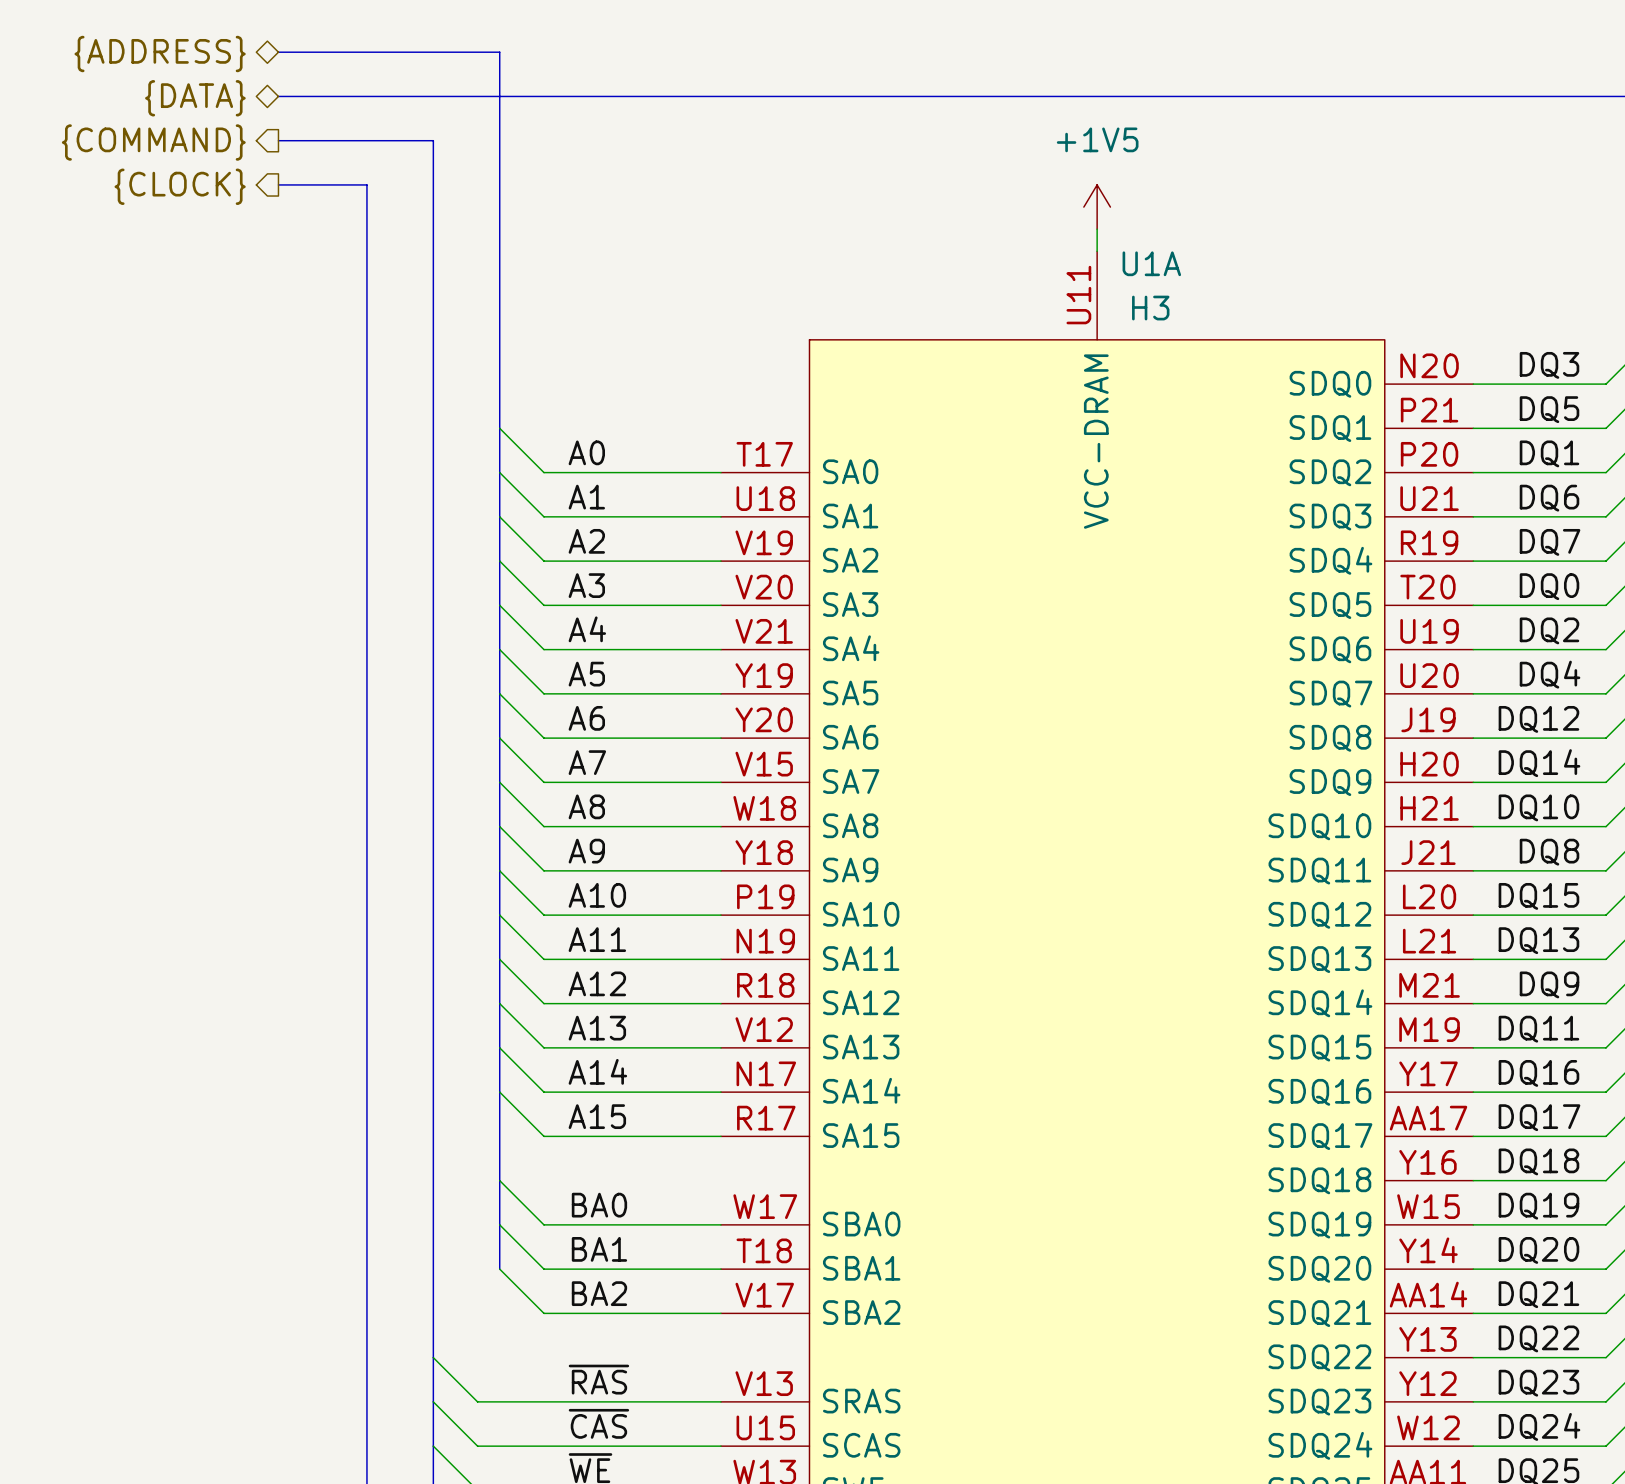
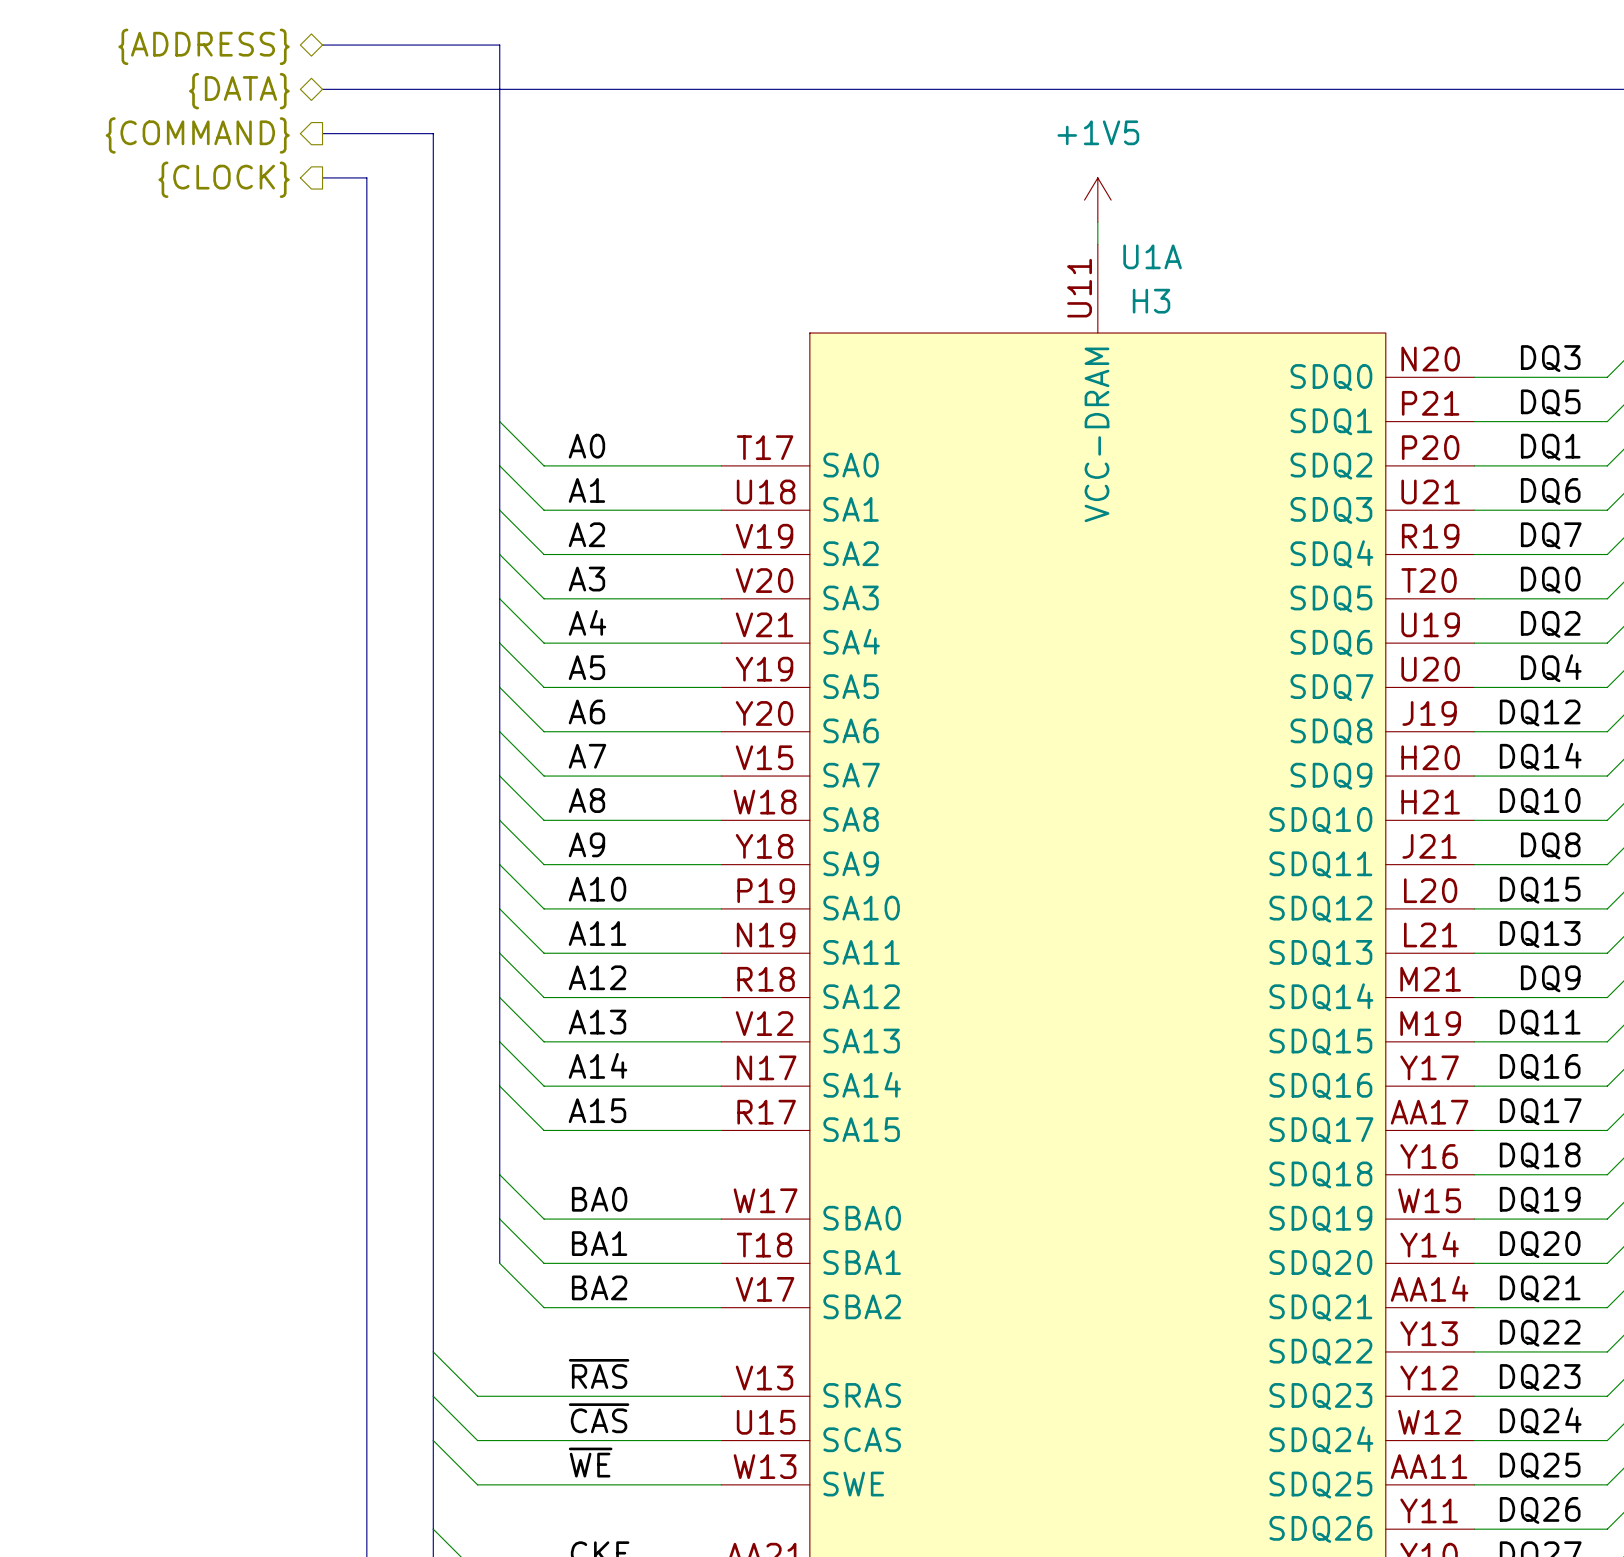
bus: (278, 52) (322, 52) -> none
hierarchical label position: {ADDRESS} (160, 54) -> {ADDRESS} (204, 46)
bus: (278, 96) (322, 96) -> none
hierarchical label position: {DATA} (195, 98) -> {DATA} (239, 91)
bus: (278, 140) (322, 140) -> none
hierarchical label position: {COMMAND} (153, 142) -> {COMMAND} (197, 135)
bus: (278, 184) (322, 184) -> none
hierarchical label position: {CLOCK} (180, 186) -> {CLOCK} (224, 179)

